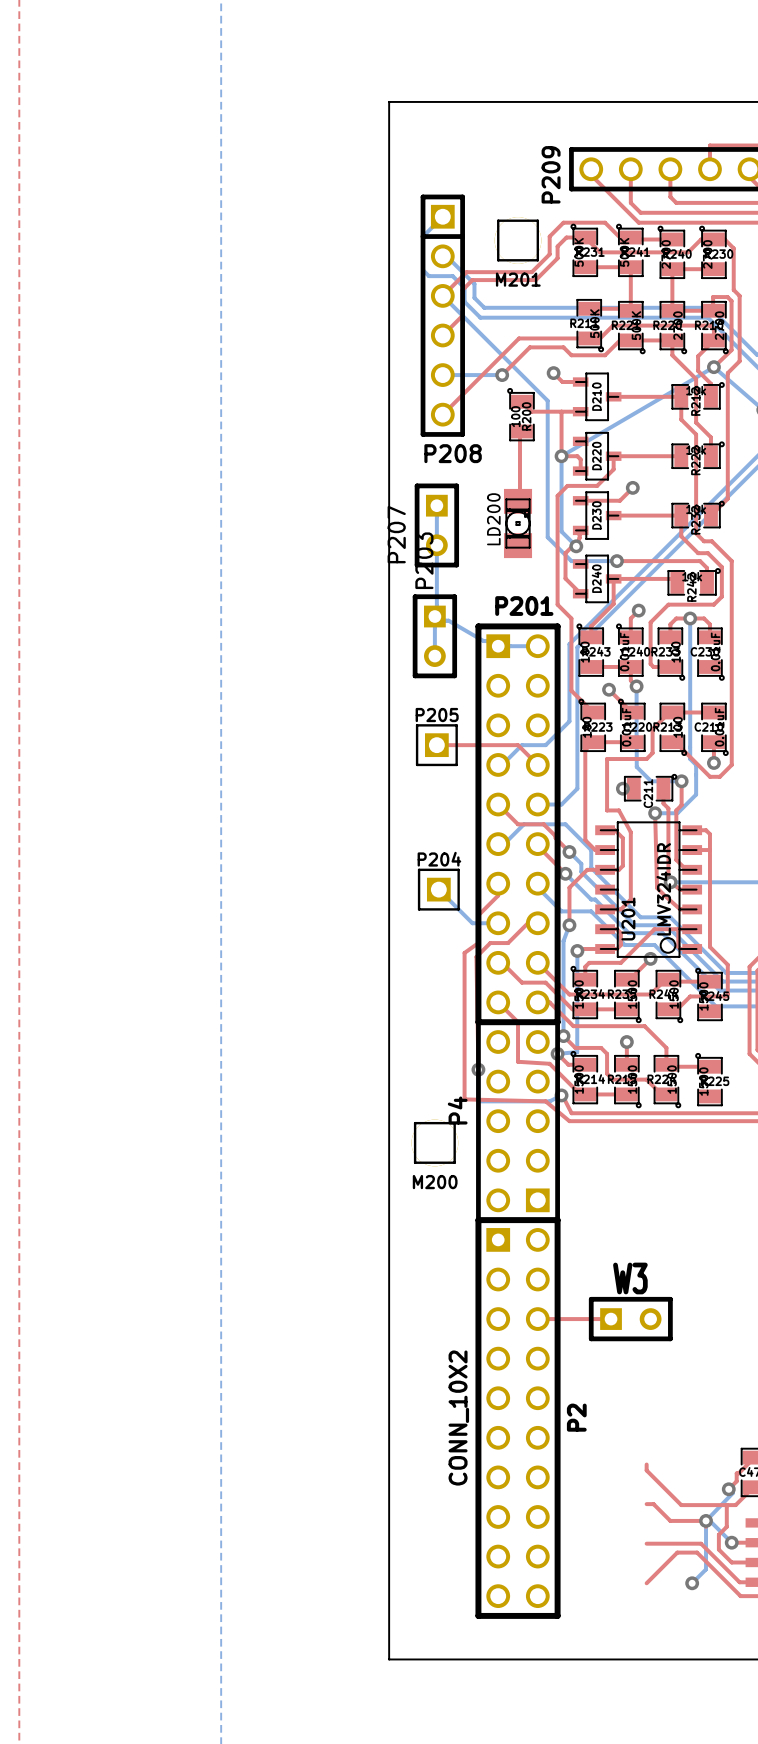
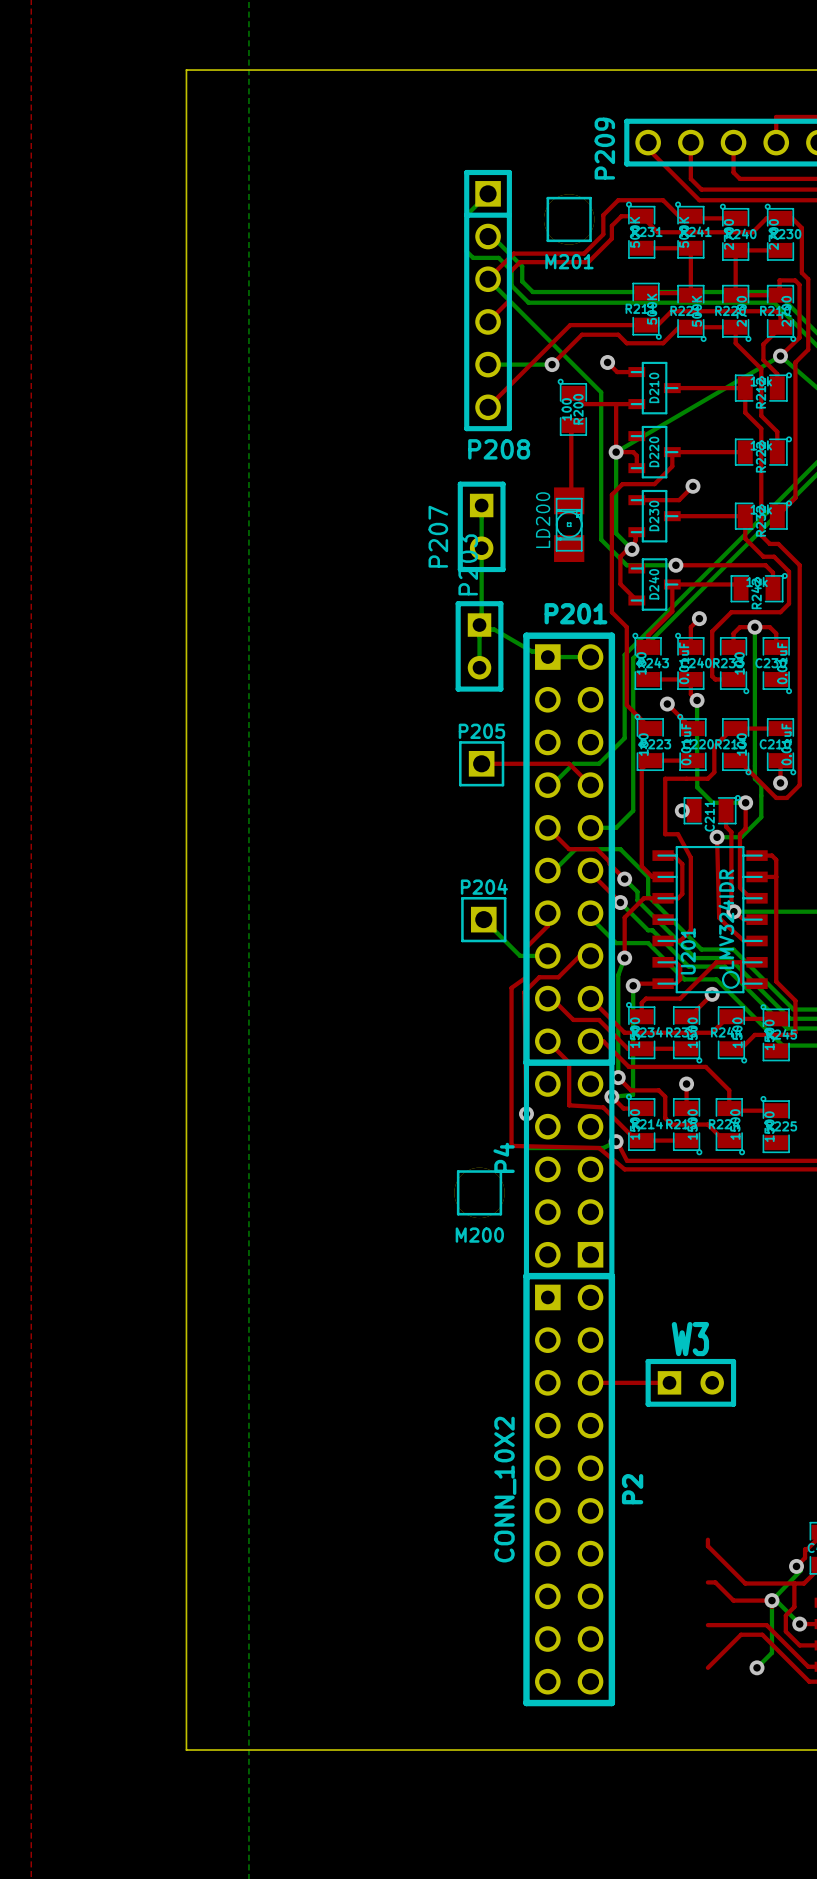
board edge: (389, 101) (389, 1659) -> (430, 70) (186, 70) (186, 1750) (430, 1750)

